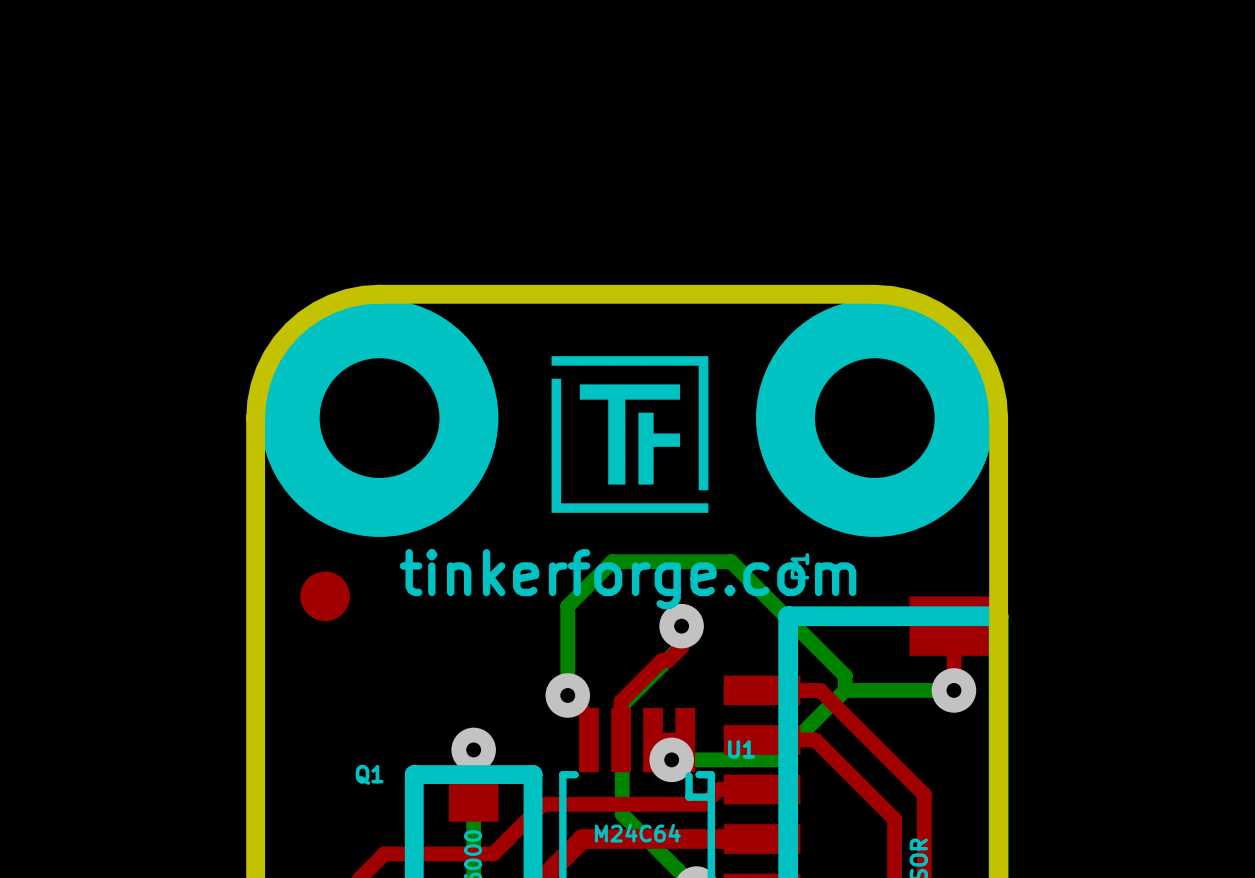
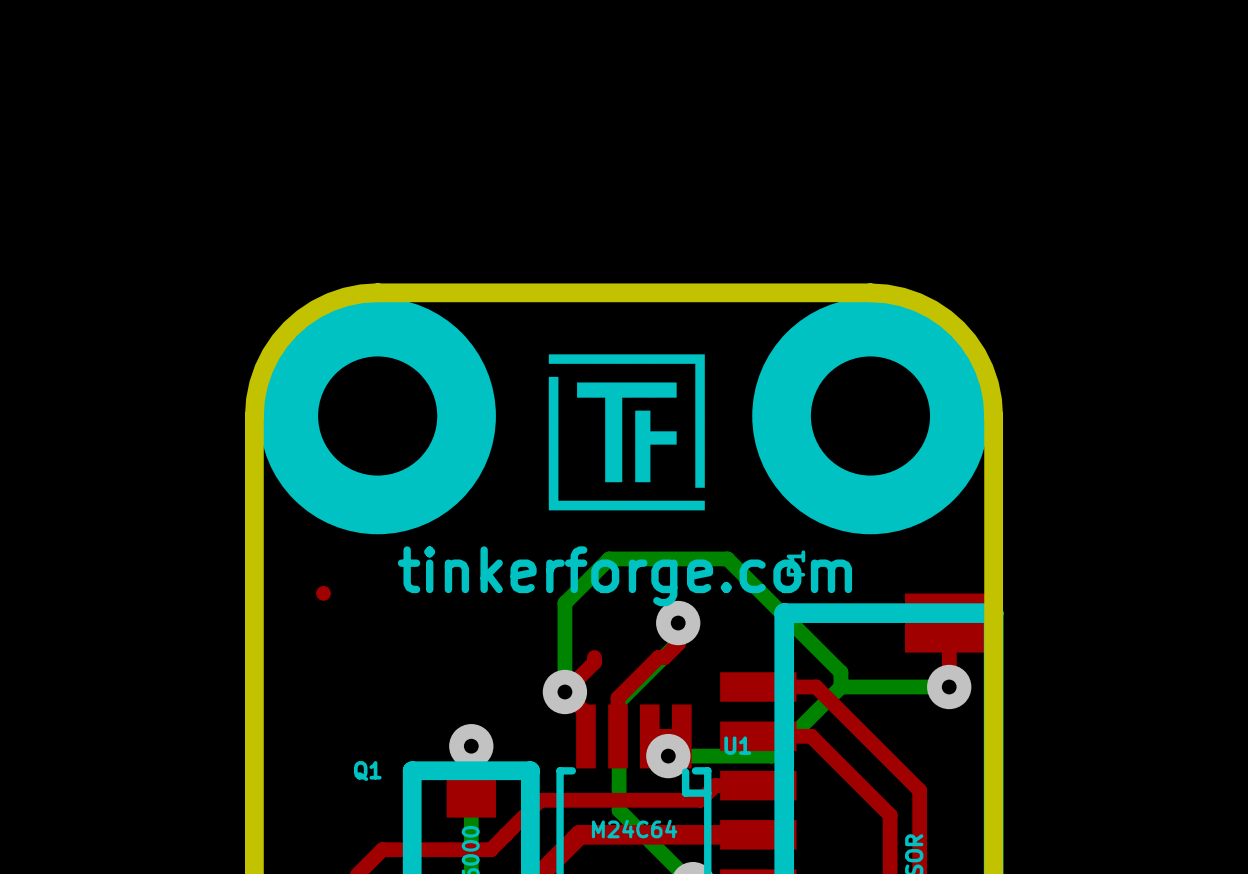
part footprint: [300, 571, 350, 622] -> [316, 585, 331, 601]
top track: none -> (594, 657) (594, 662) (564, 692)

